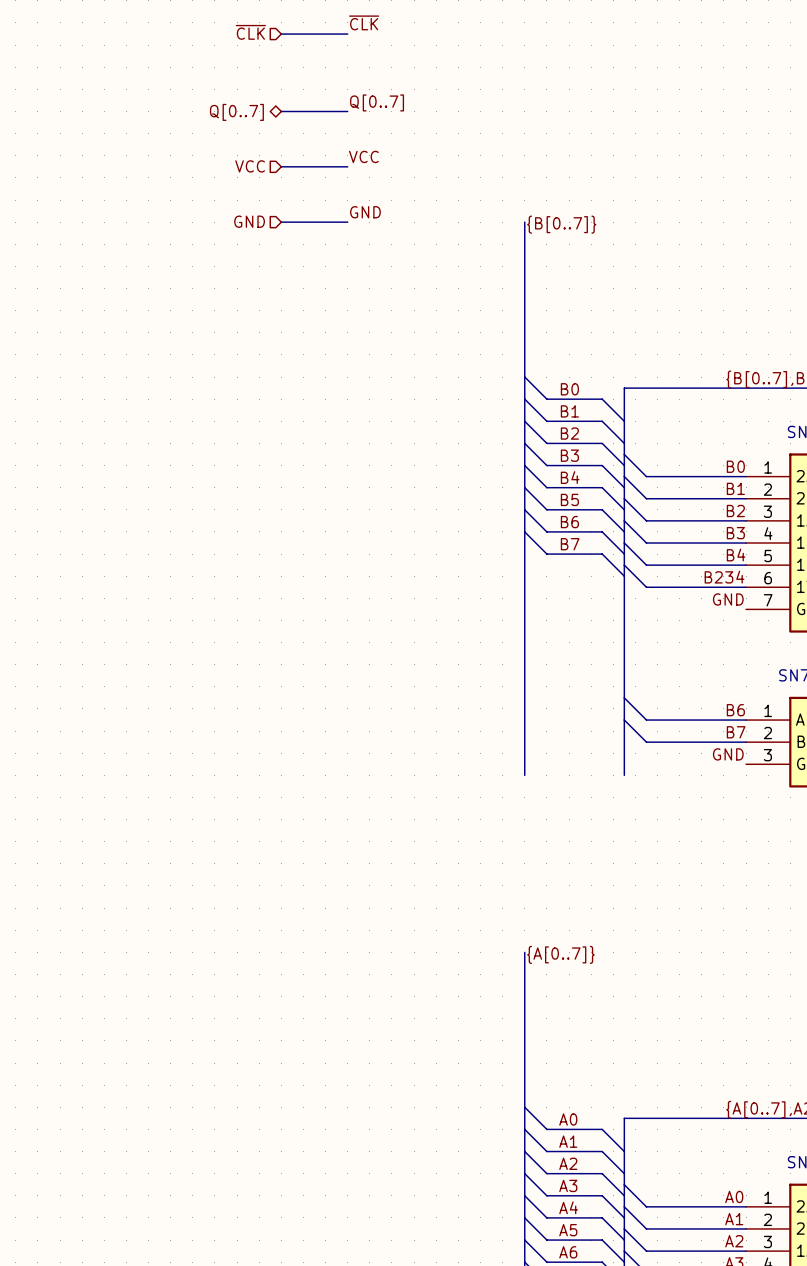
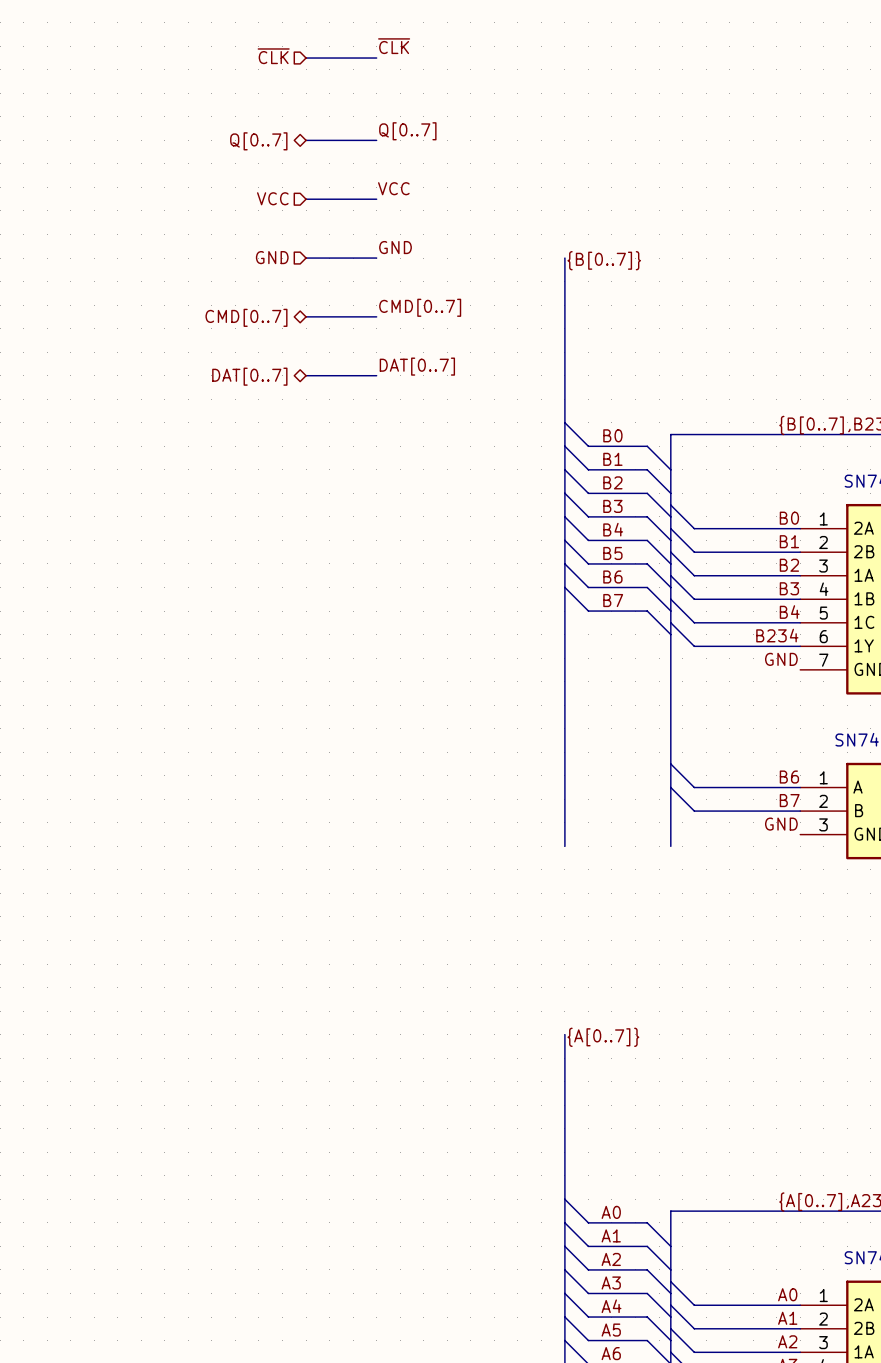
label: none -> CMD[0..7] (420, 307)
bus: none -> (306, 316) (376, 316)
hierarchical label: none -> CMD[0..7] (246, 317)
label: none -> DAT[0..7] (417, 366)
bus: none -> (306, 375) (376, 375)
hierarchical label: none -> DAT[0..7] (249, 376)

